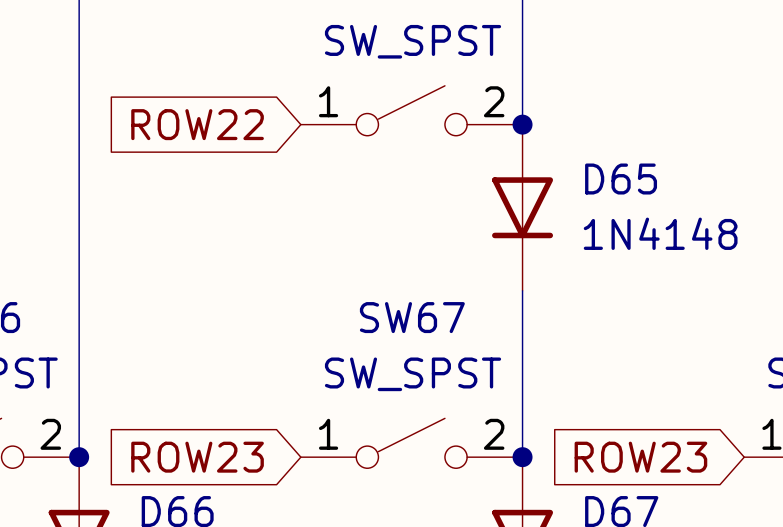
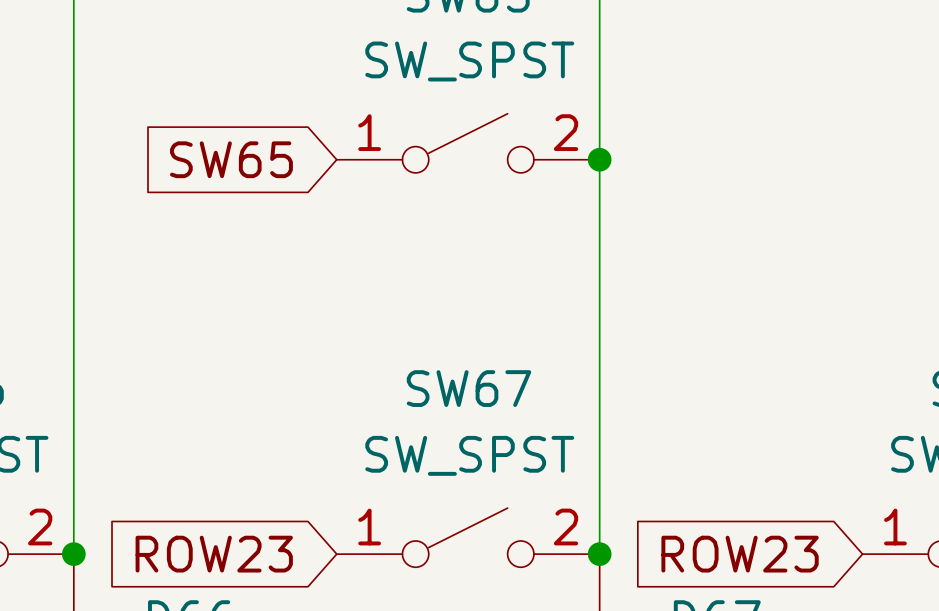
global label: ROW22 (197, 124) -> SW65 (231, 159)
D65: 1N4148 (522, 207) -> none

